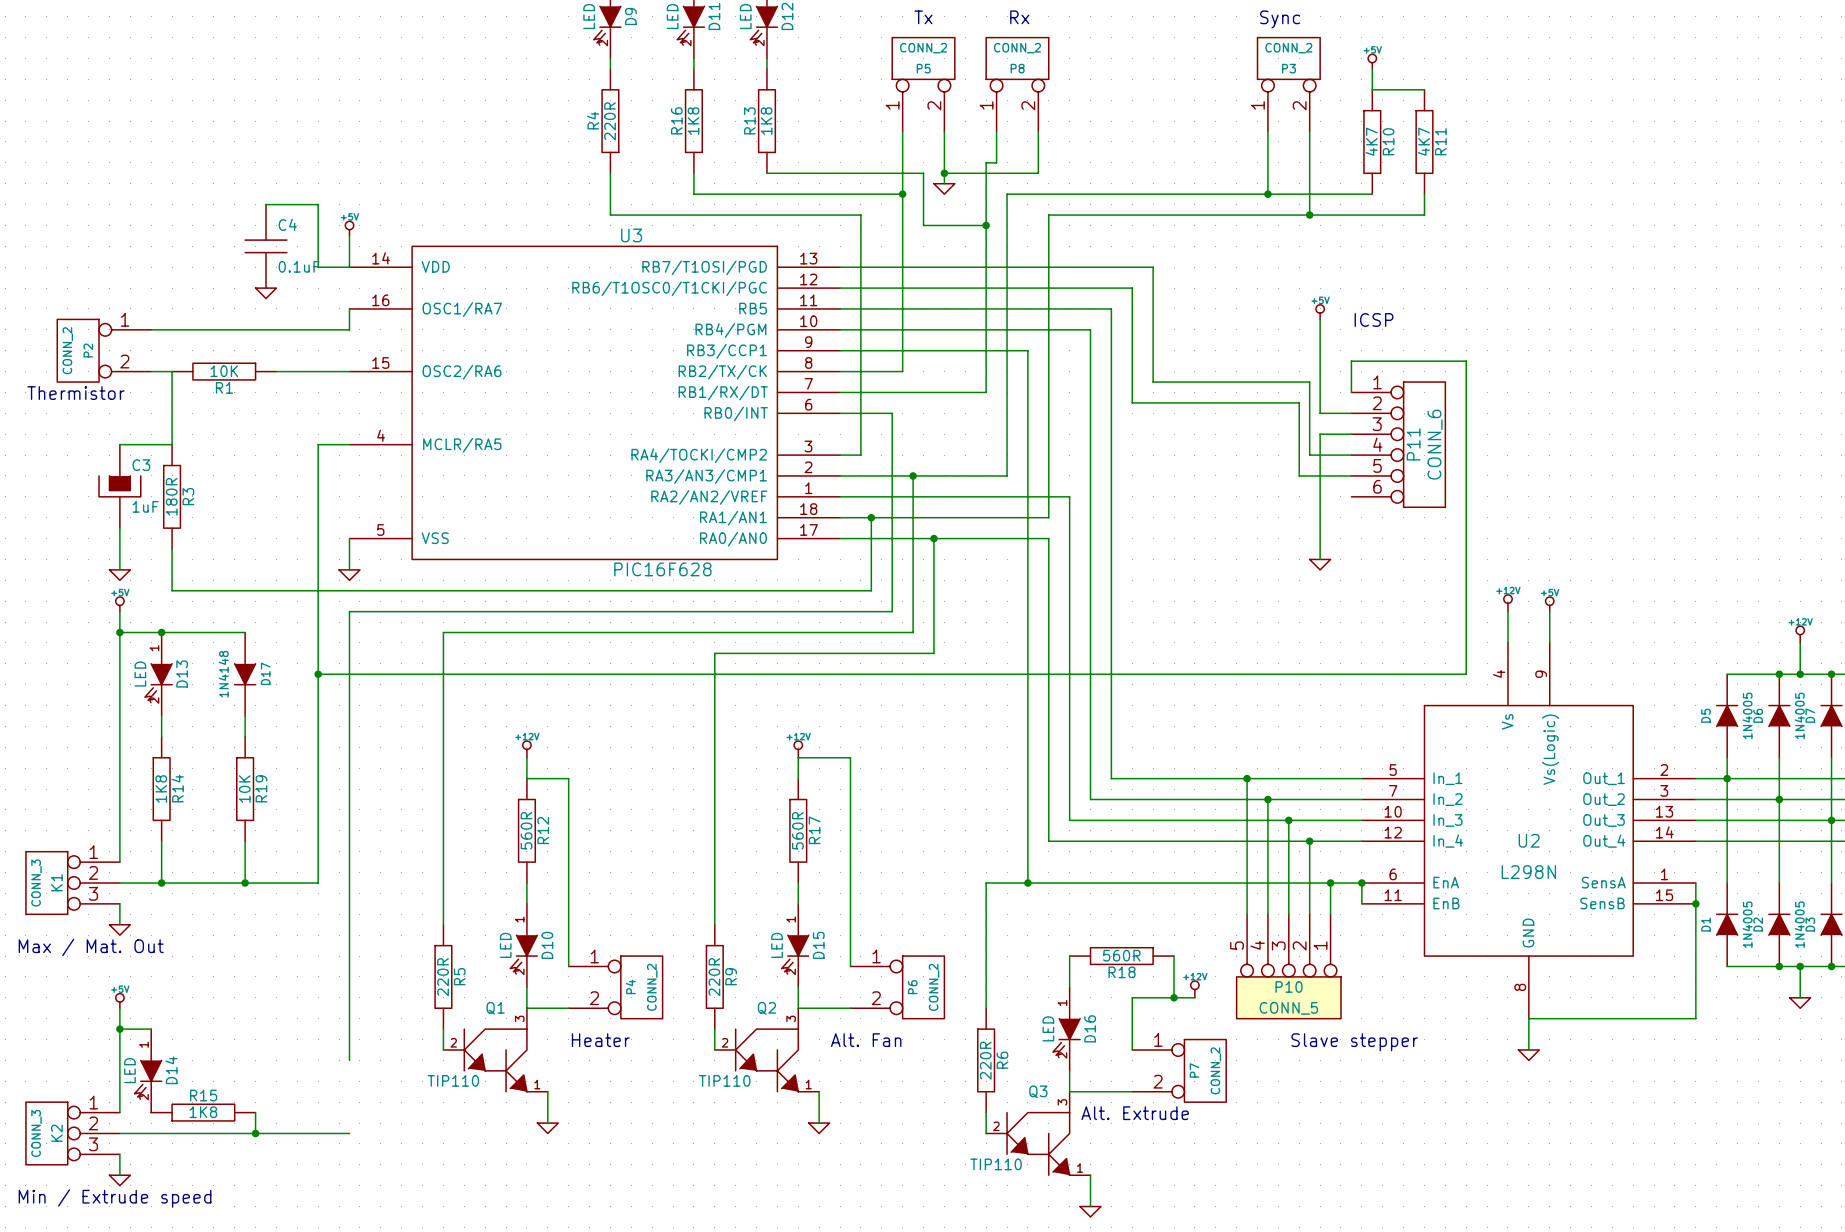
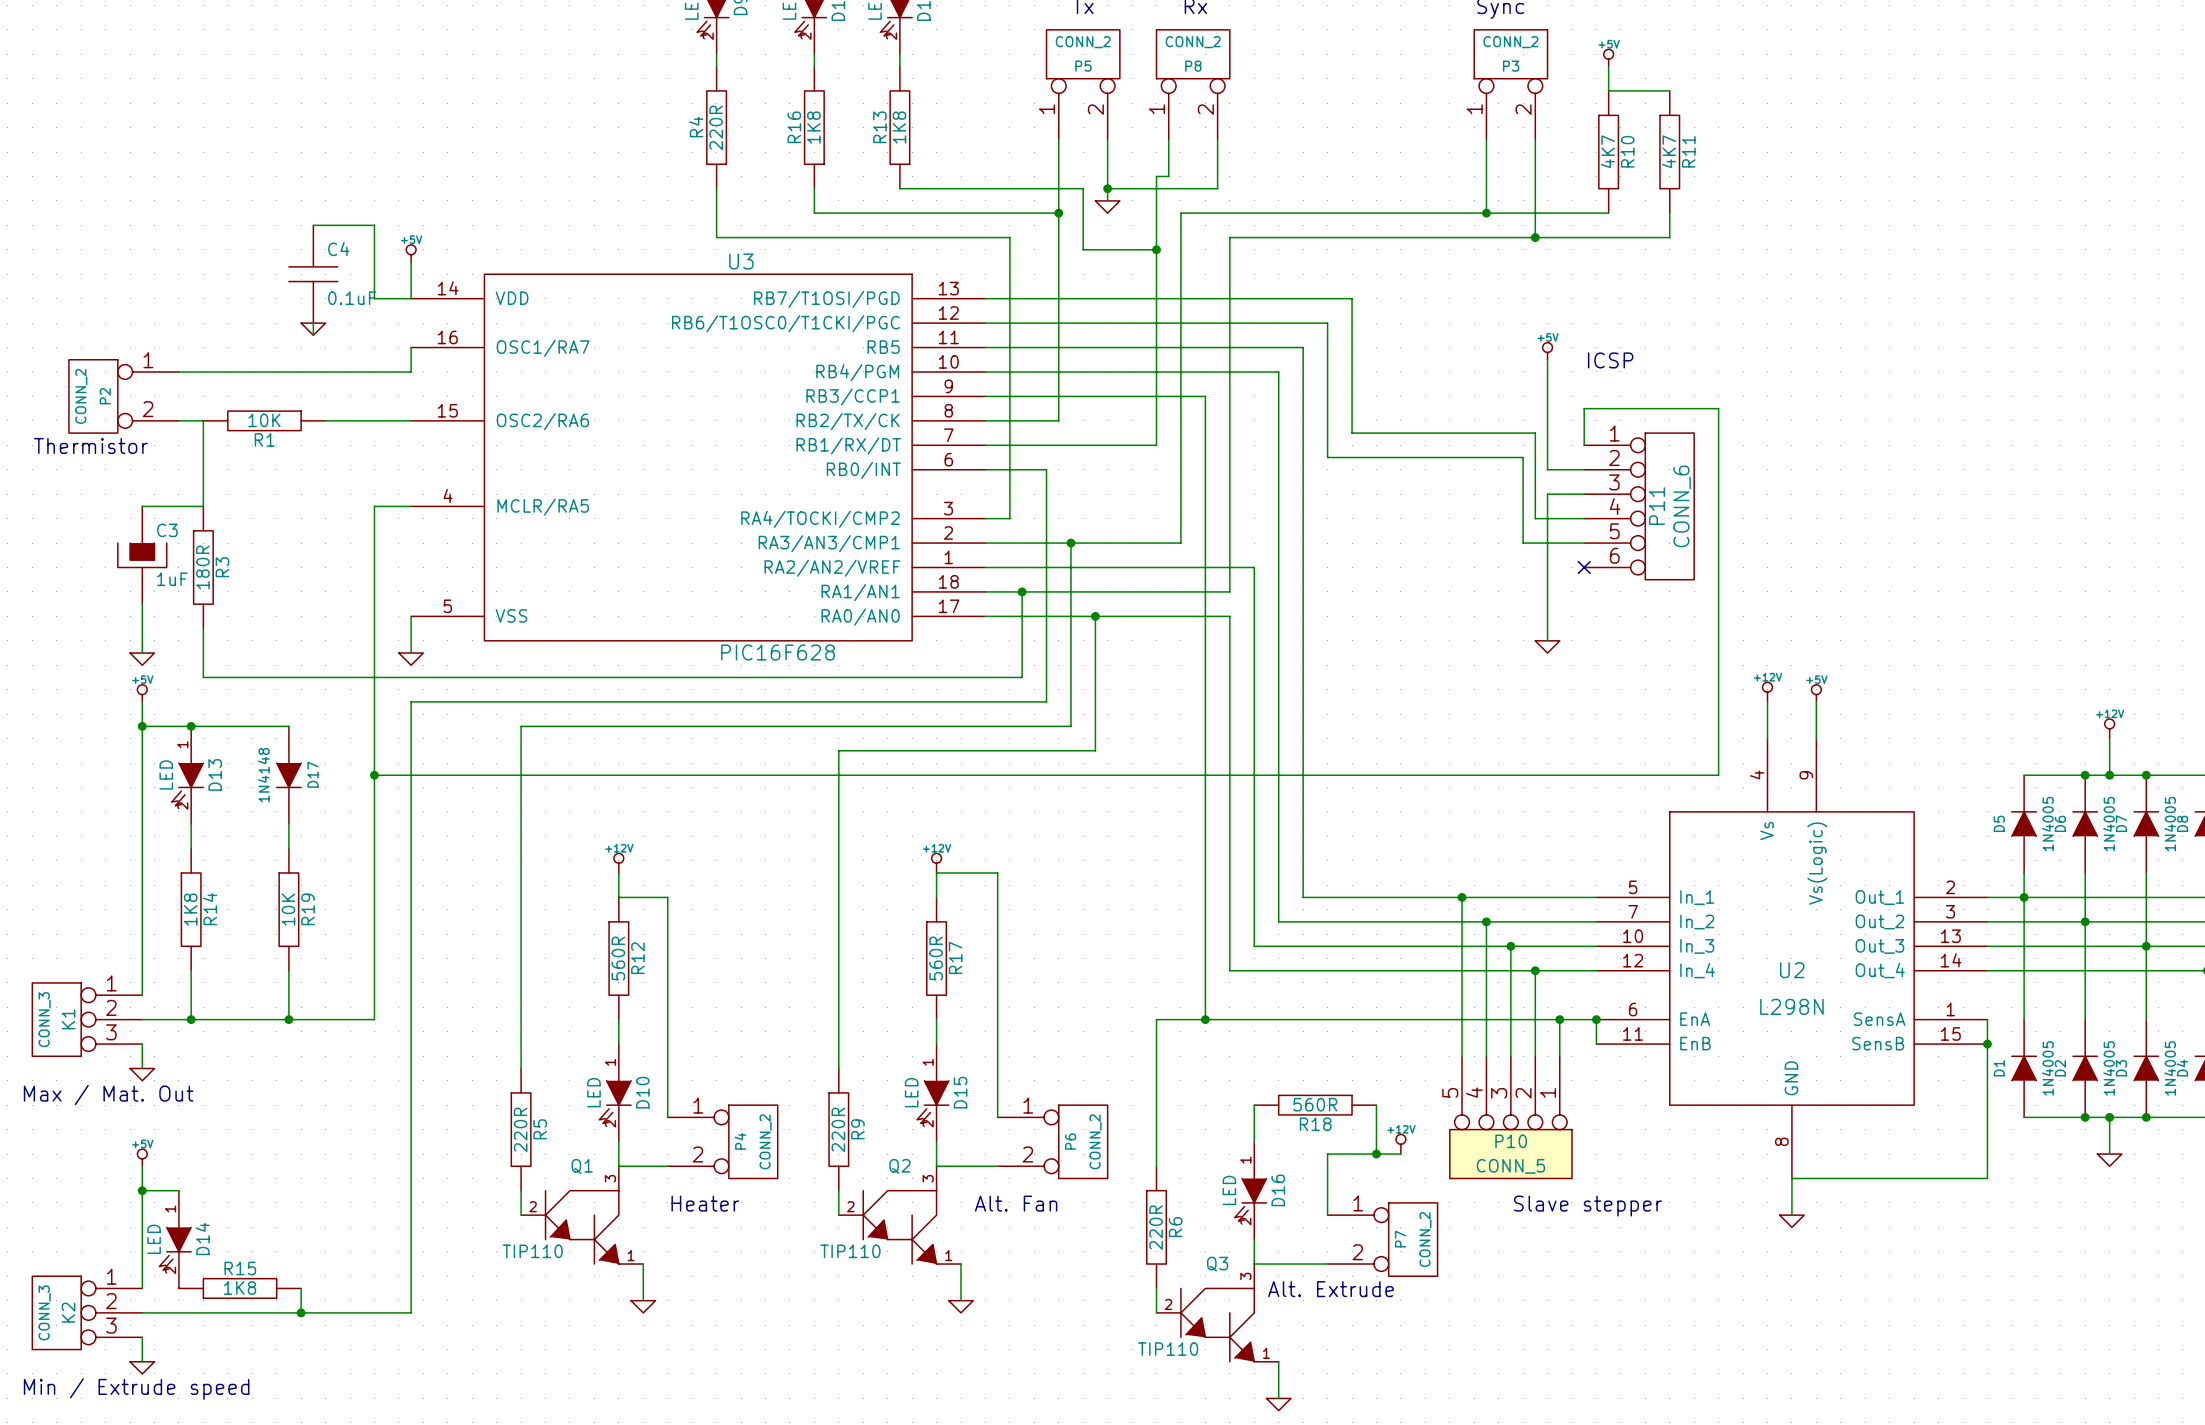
wire: none -> (313, 323) (313, 335)
no-connect mark: none -> (1584, 567)
wire: none -> (411, 1227) (411, 1312)

